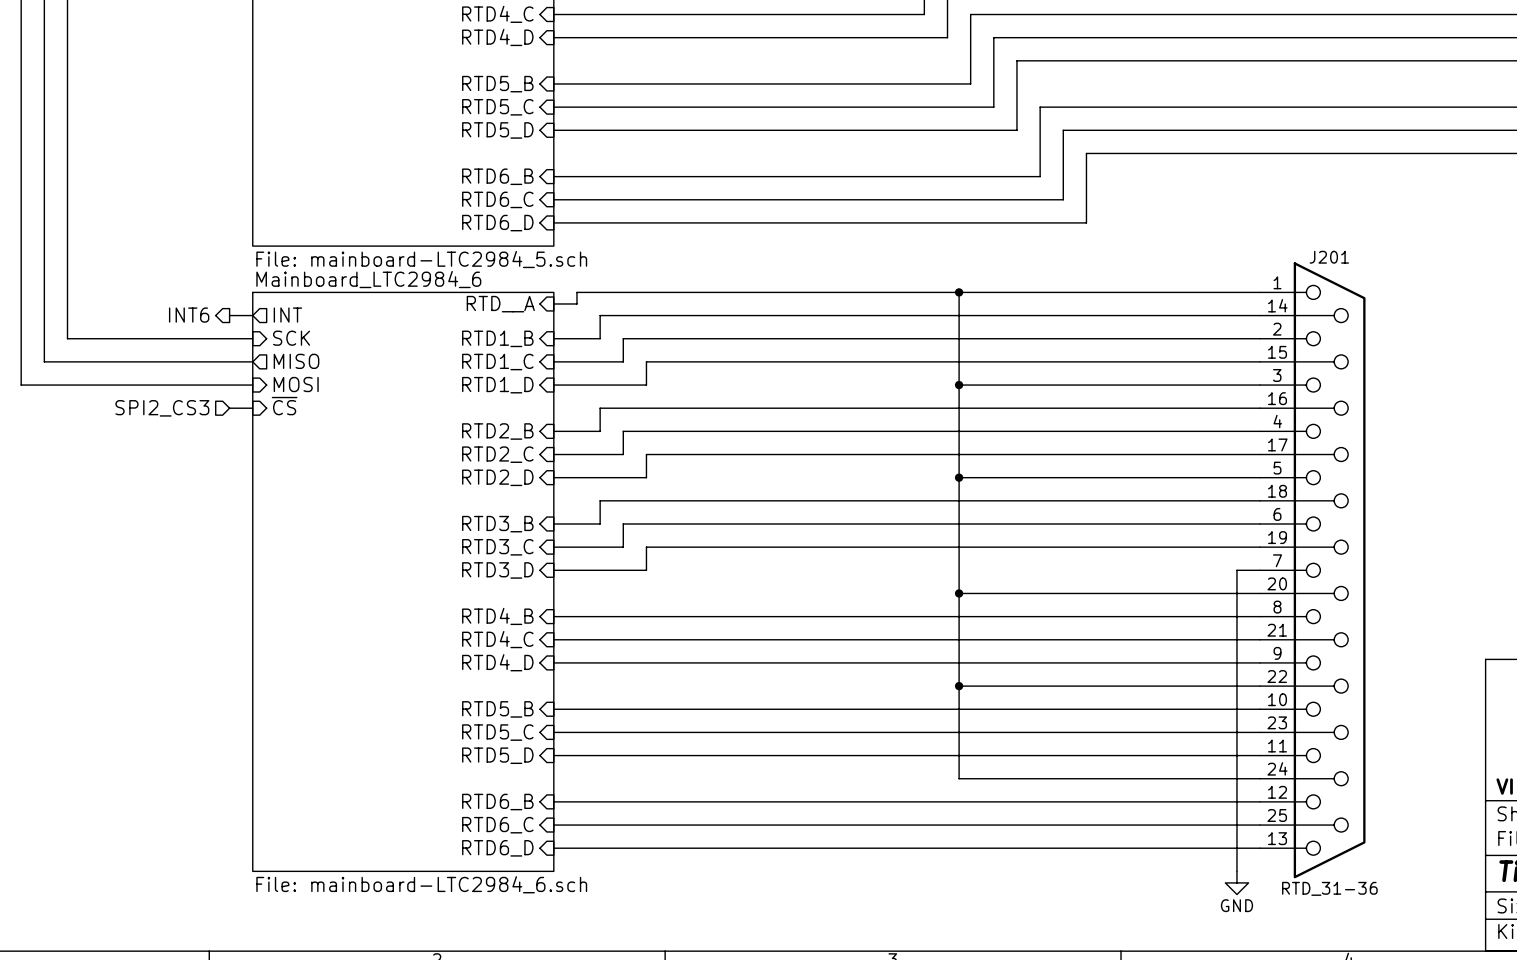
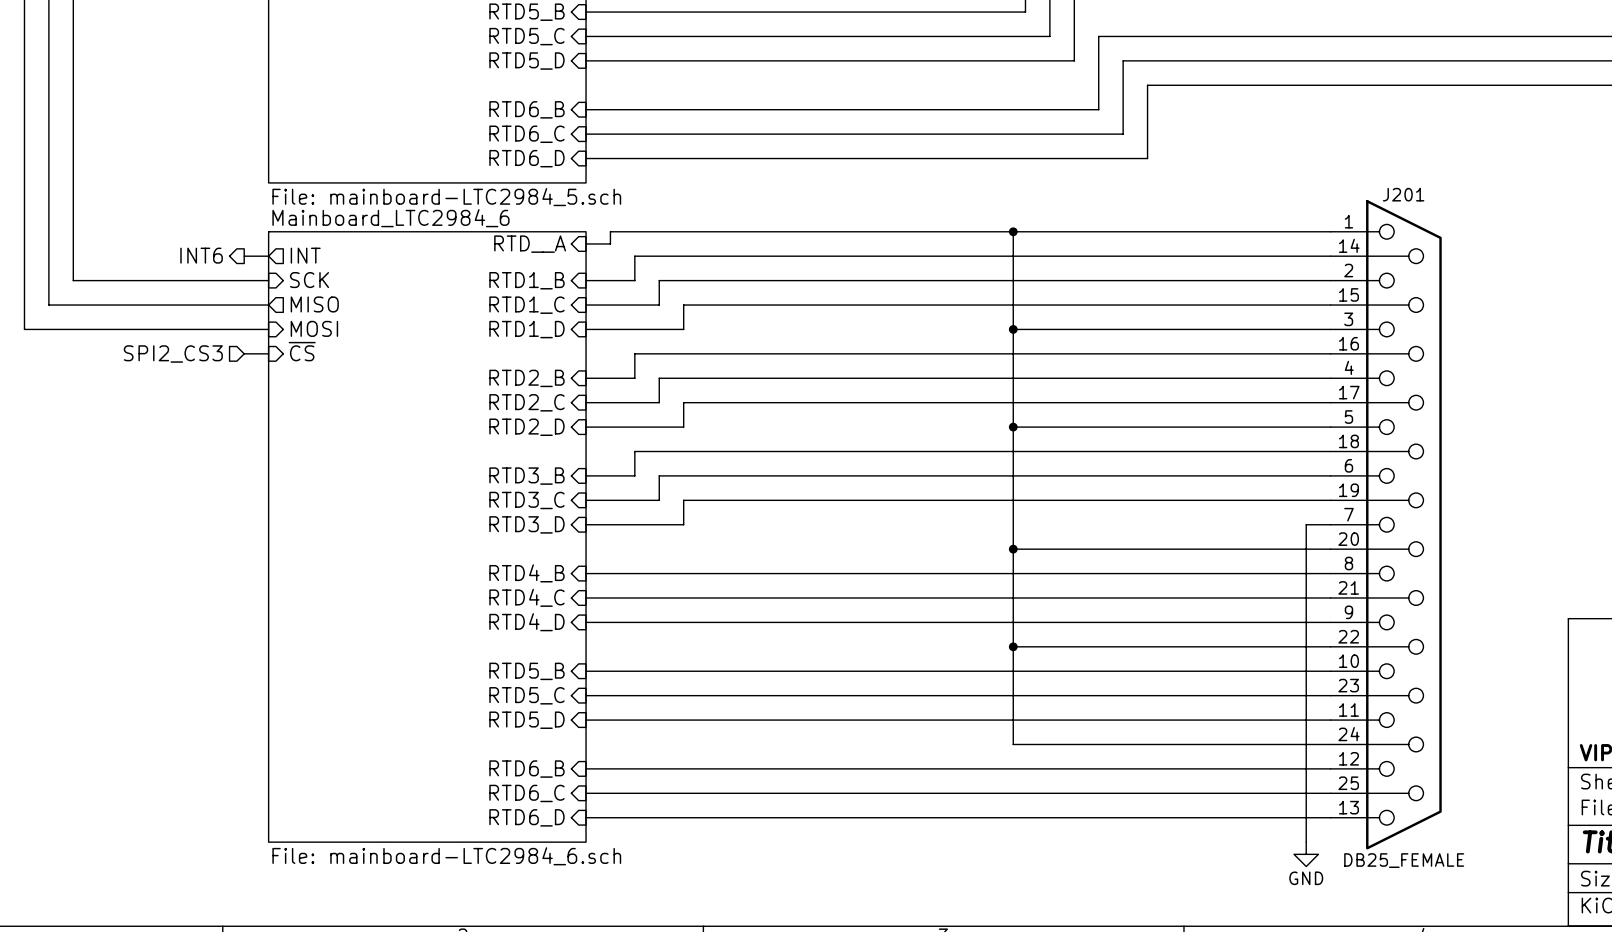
J201 value: RTD_31-36 (1329, 888) -> DB25_FEMALE (1404, 860)

